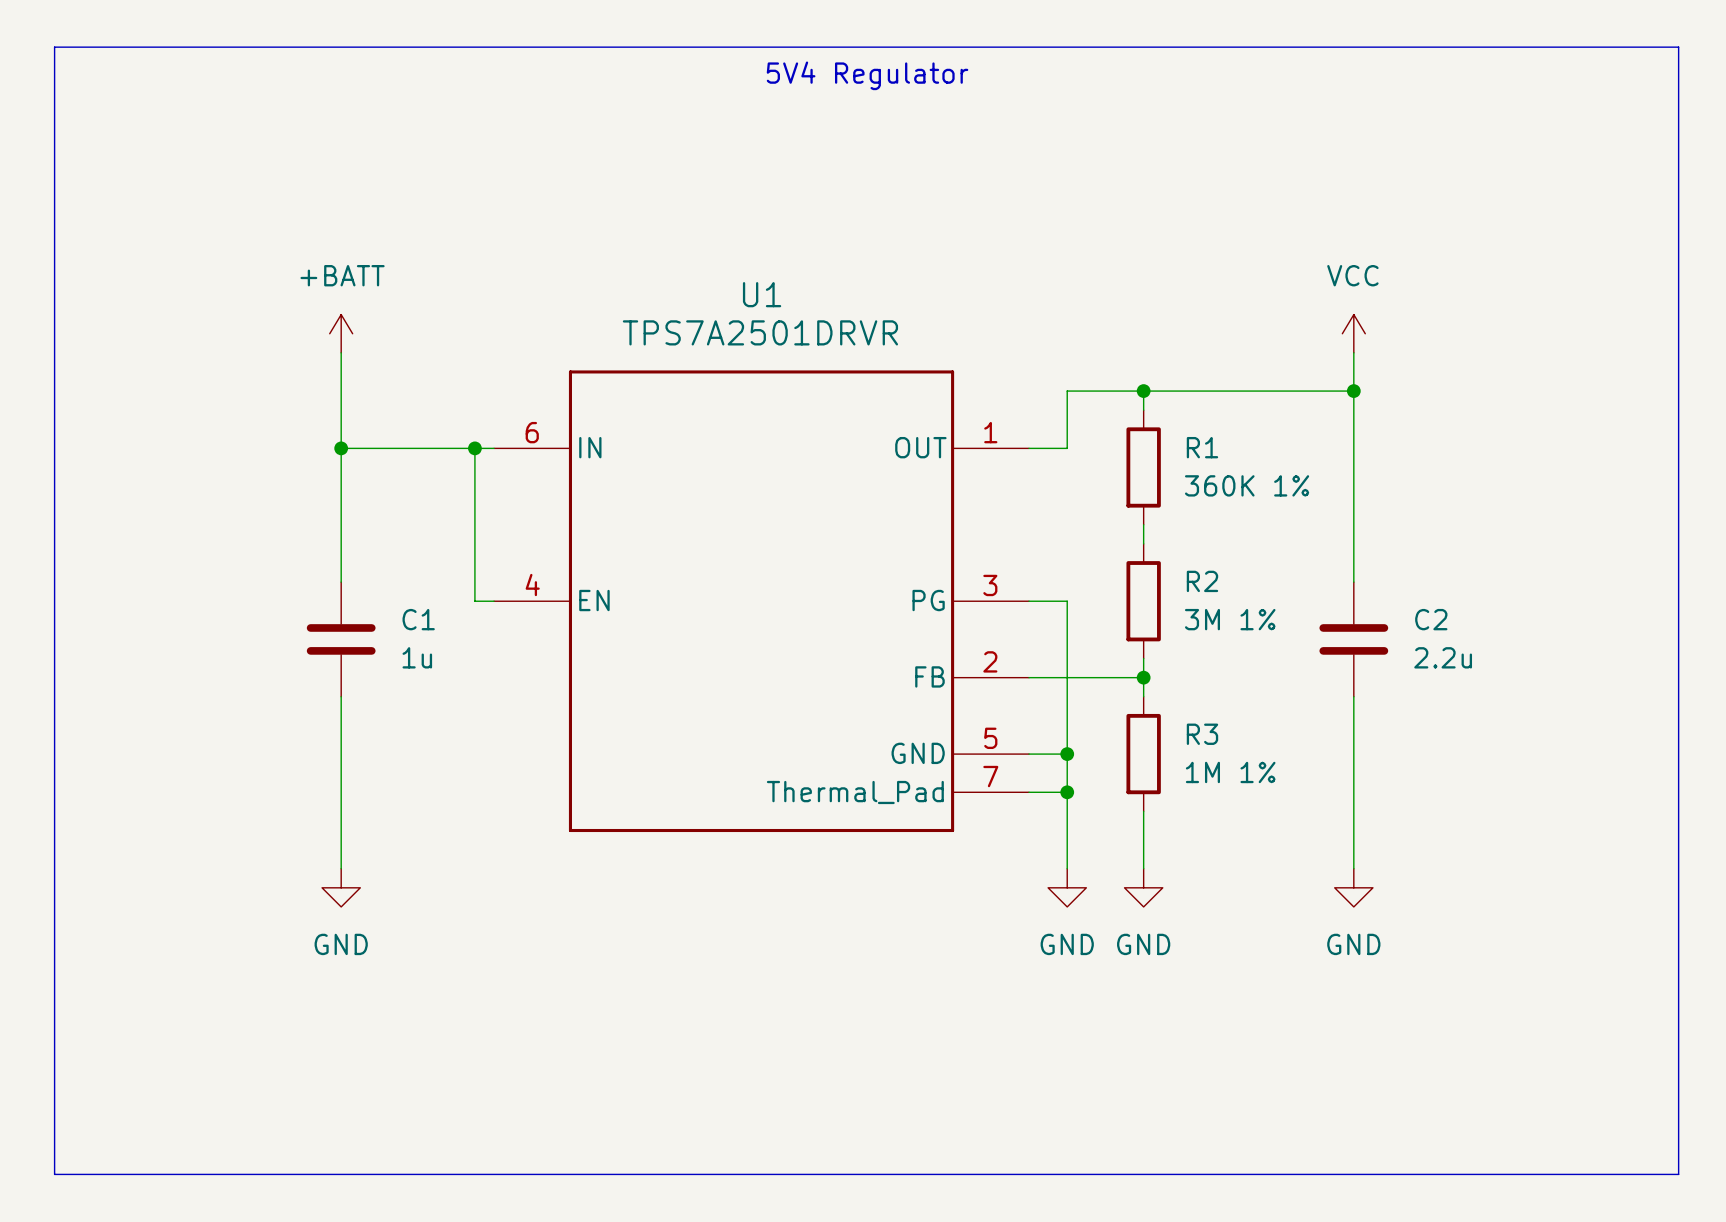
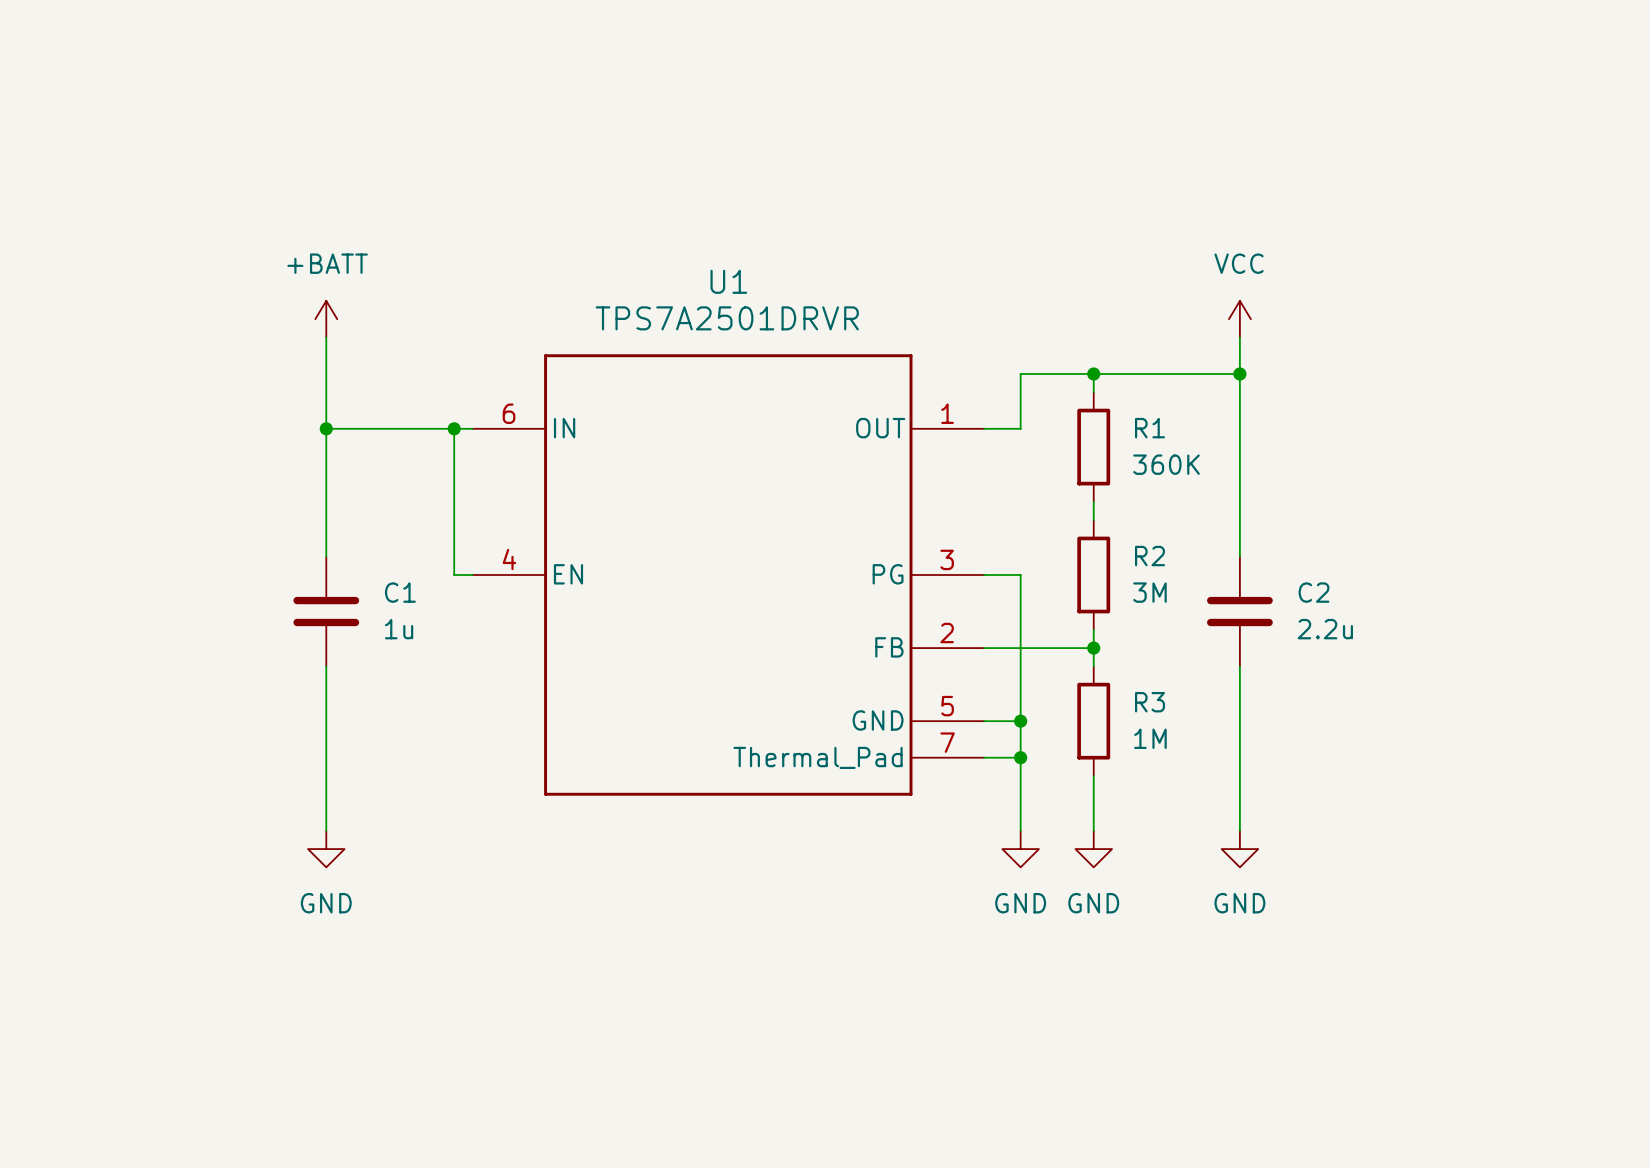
line: (54, 47) (1678, 47) (1678, 1174) (54, 1174) (54, 47) -> none
text: 5V4 Regulator (867, 75) -> none
power symbol position: VCC (1353, 333) -> VCC (1239, 319)
wire: (1353, 352) (1353, 582) -> (1239, 337) (1239, 556)
wire: (1296, 391) (1353, 391) -> none
junction position: (1353, 391) -> (1239, 373)
R1 value: 360K 1% (1247, 485) -> 360K (1166, 464)
R2 value: 3M 1% (1230, 619) -> 3M (1150, 592)
C2 position: (1353, 639) -> (1239, 611)
wire: (1353, 696) (1353, 868) -> (1239, 666) (1239, 830)
R3 value: 1M 1% (1230, 772) -> 1M (1150, 738)
power symbol position: GND (1353, 887) -> GND (1239, 849)

